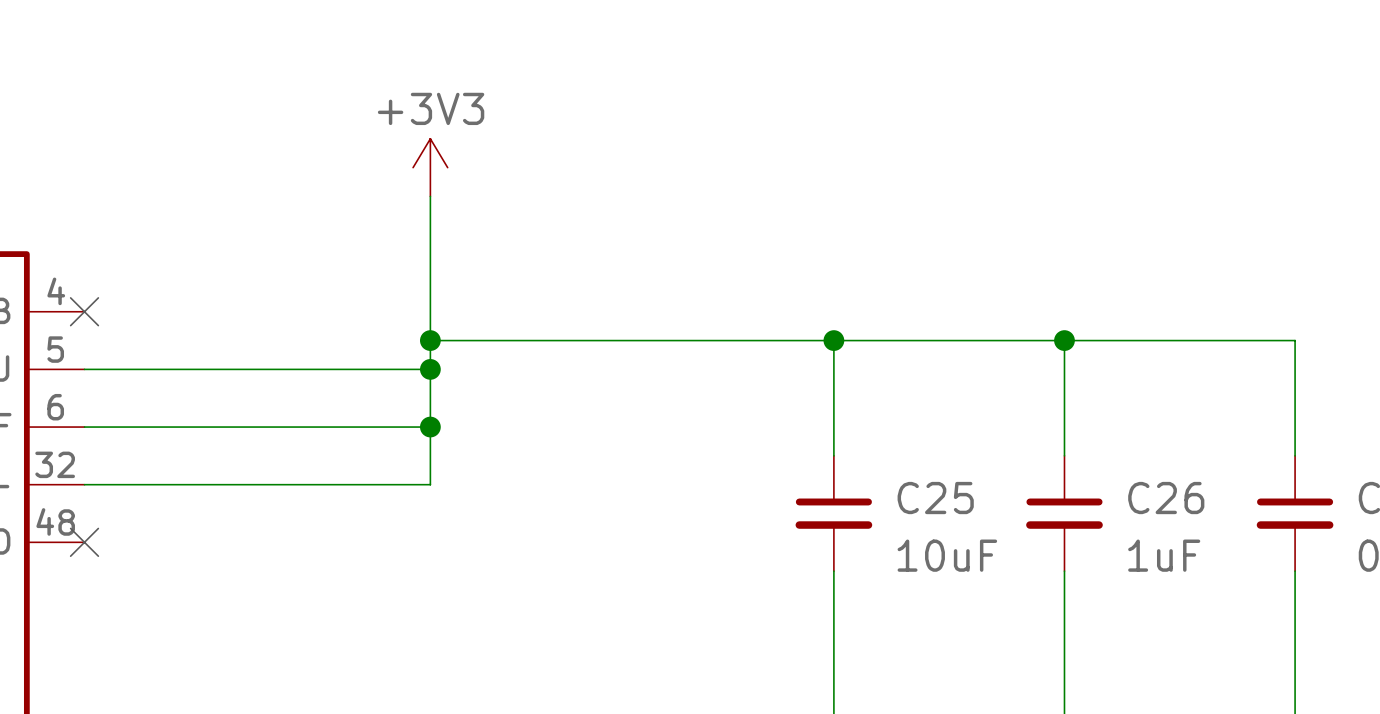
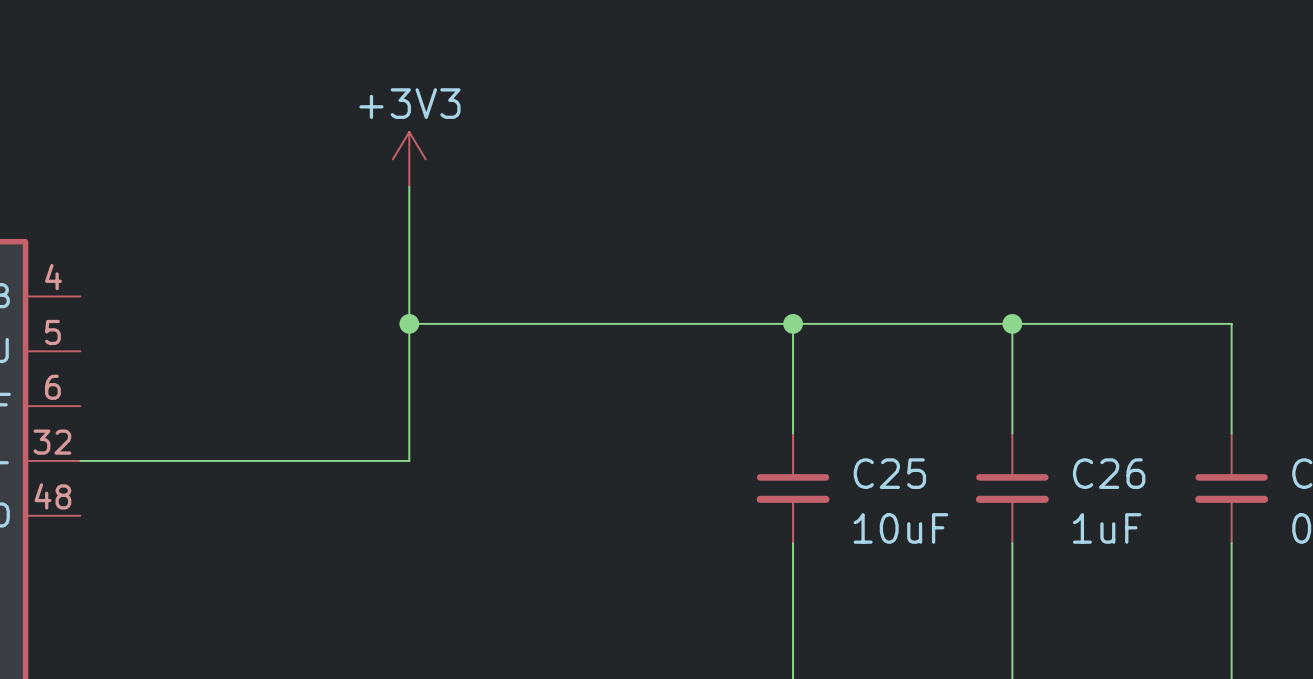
no-connect mark: (84, 311) -> none
wire: (84, 369) (430, 369) -> none
junction: (430, 369) -> none
wire: (84, 427) (430, 427) -> none
junction: (430, 427) -> none
no-connect mark: (84, 542) -> none

